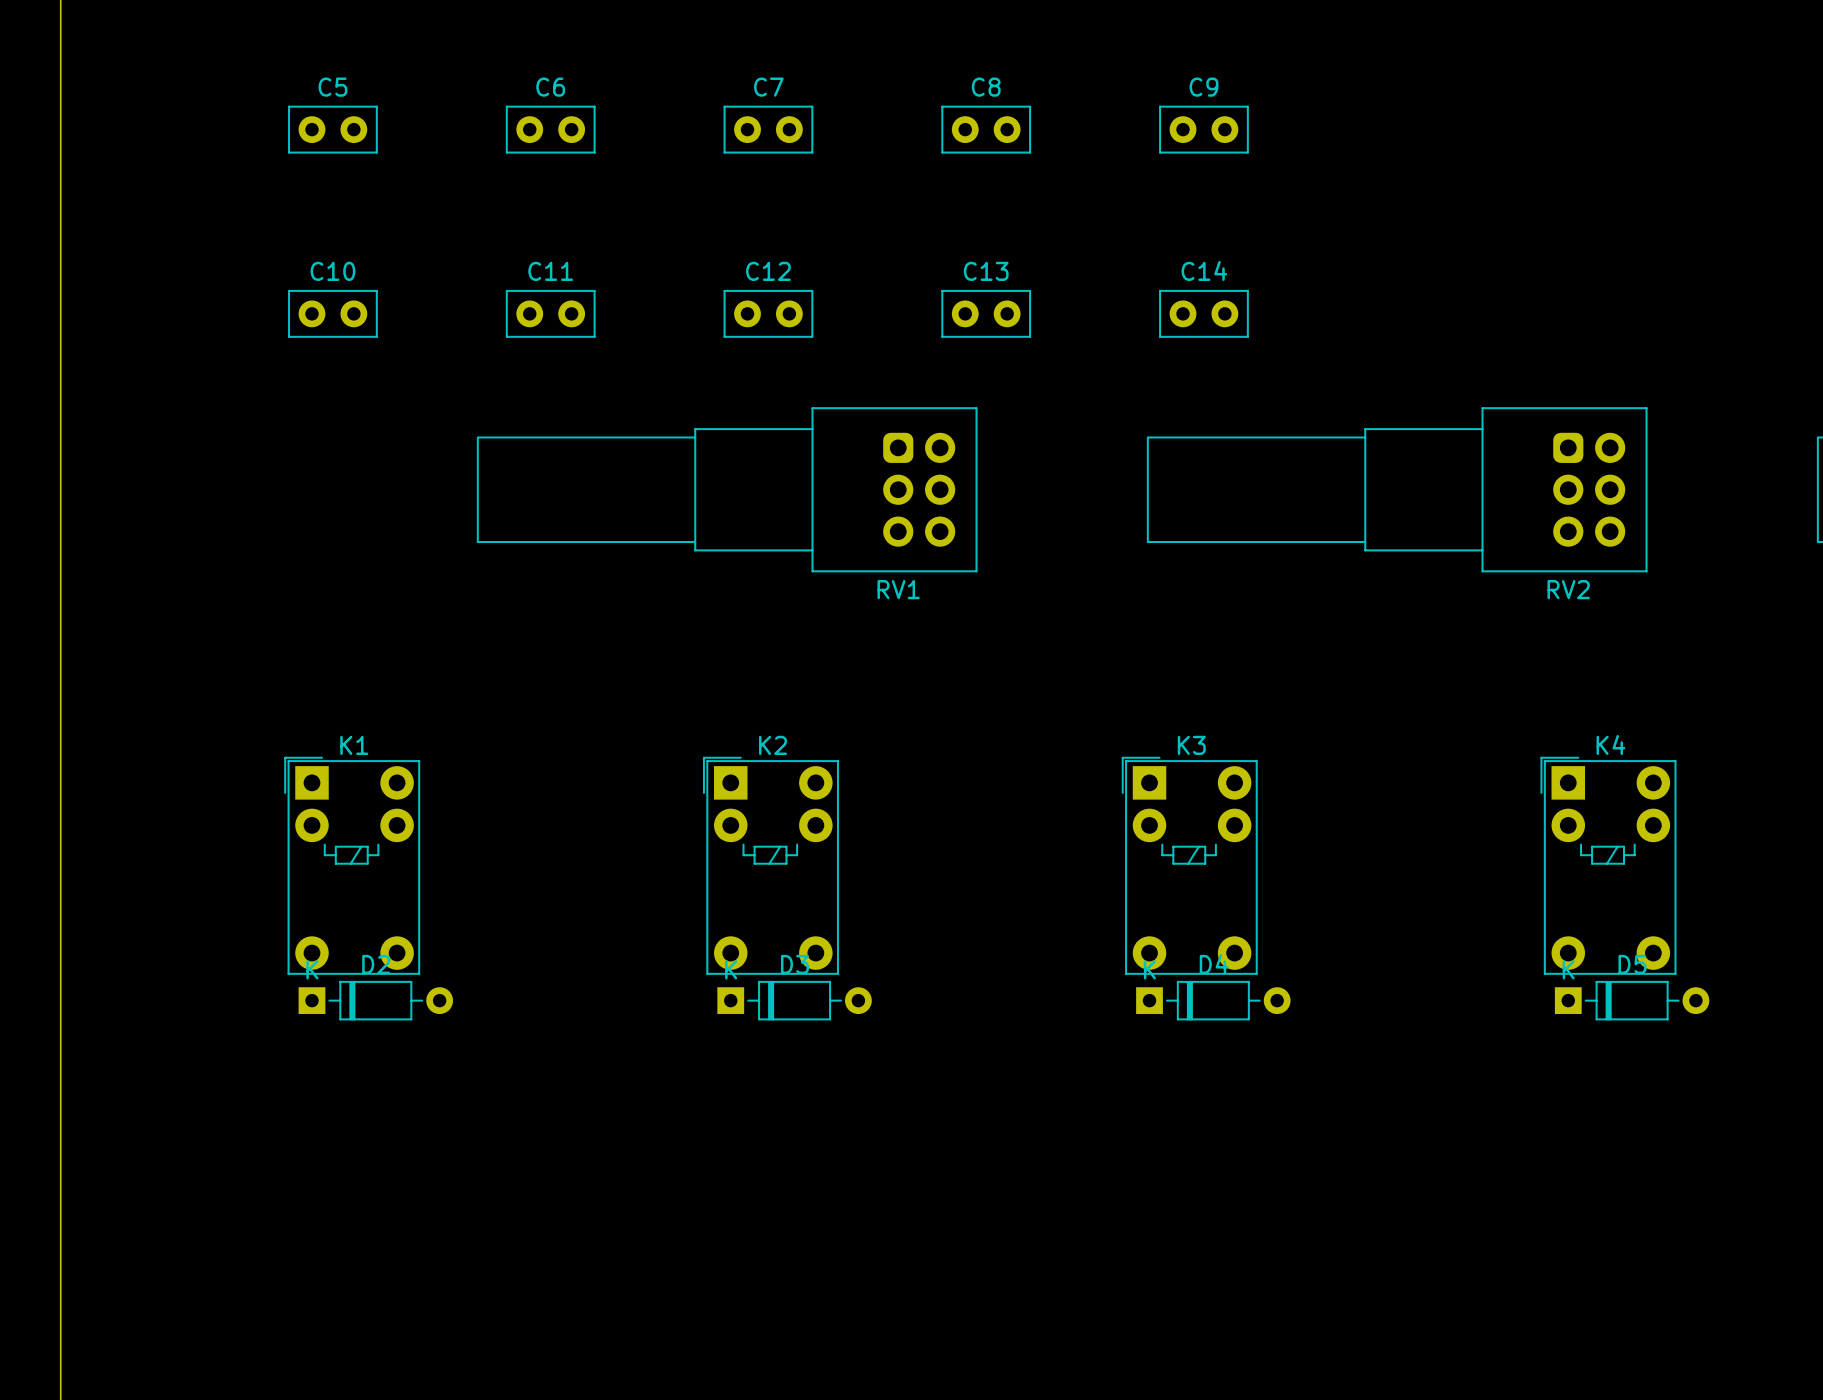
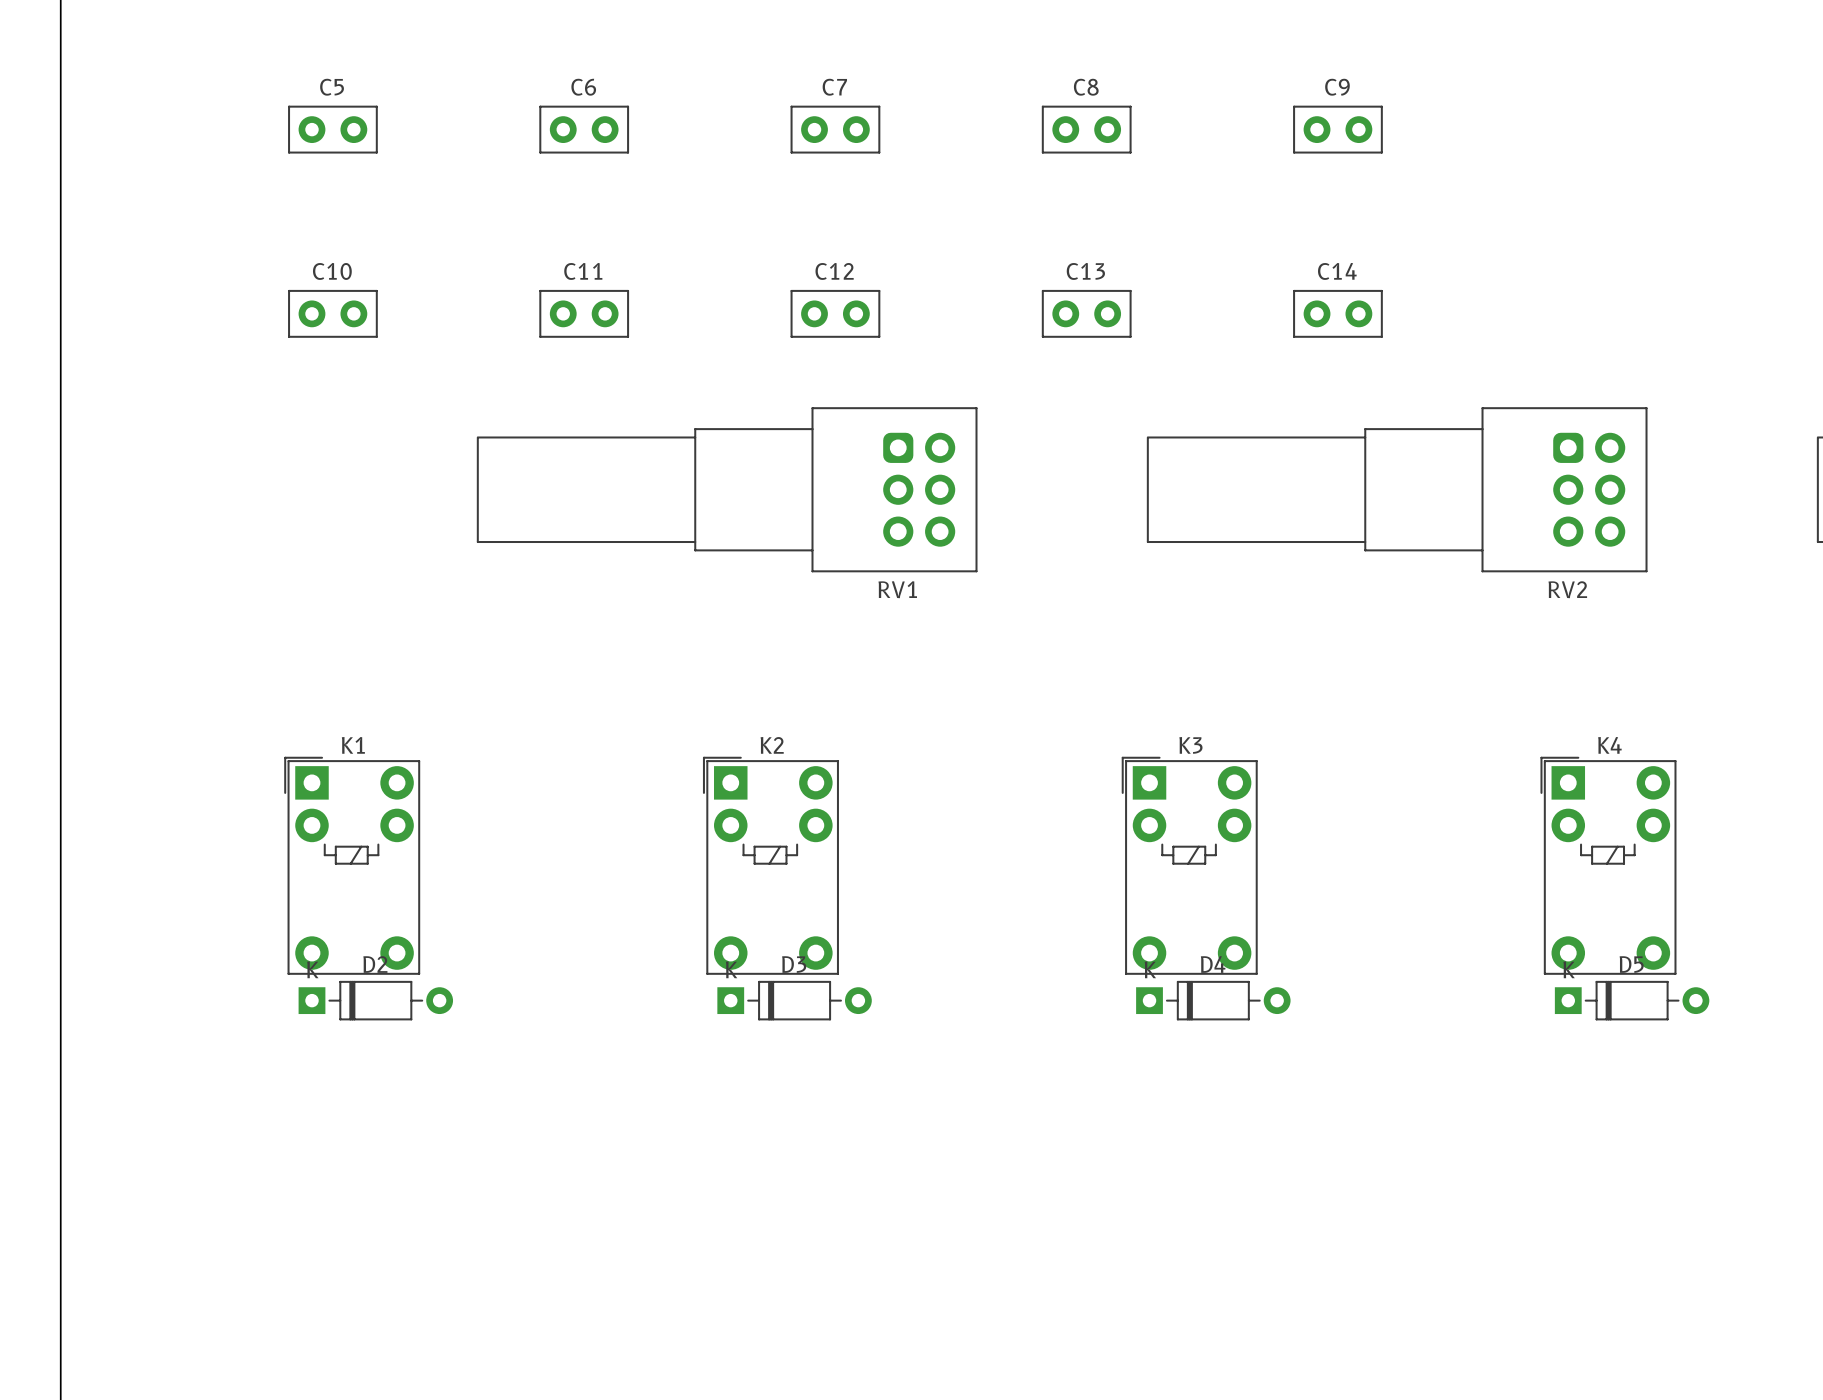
C6 position: (550, 129) -> (584, 129)
C7 position: (768, 129) -> (835, 129)
C8 position: (986, 129) -> (1086, 129)
C9 position: (1203, 129) -> (1337, 129)
C11 position: (550, 313) -> (584, 313)
C12 position: (768, 313) -> (835, 313)
C13 position: (986, 313) -> (1086, 313)
C14 position: (1203, 313) -> (1337, 313)

